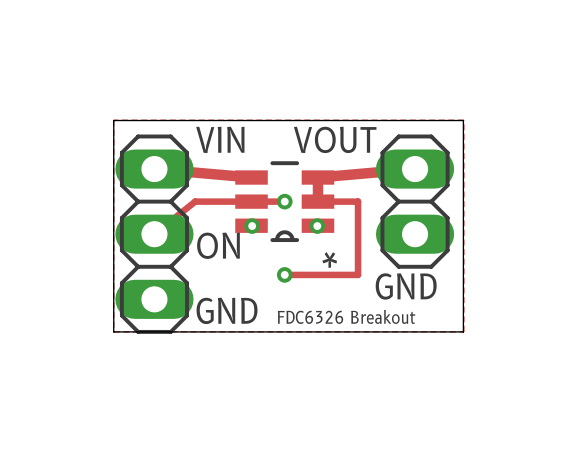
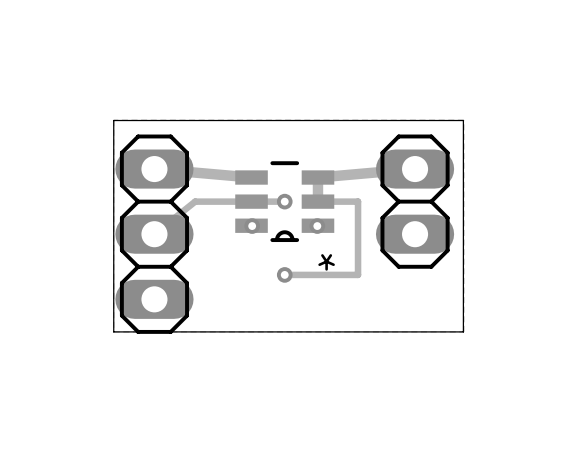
text: VIN (220, 139) -> none
text: VOUT (335, 139) -> none
text: ON (218, 245) -> none
text: GND (406, 286) -> none
text: GND (227, 310) -> none
text: FDC6326 Breakout (346, 316) -> none

